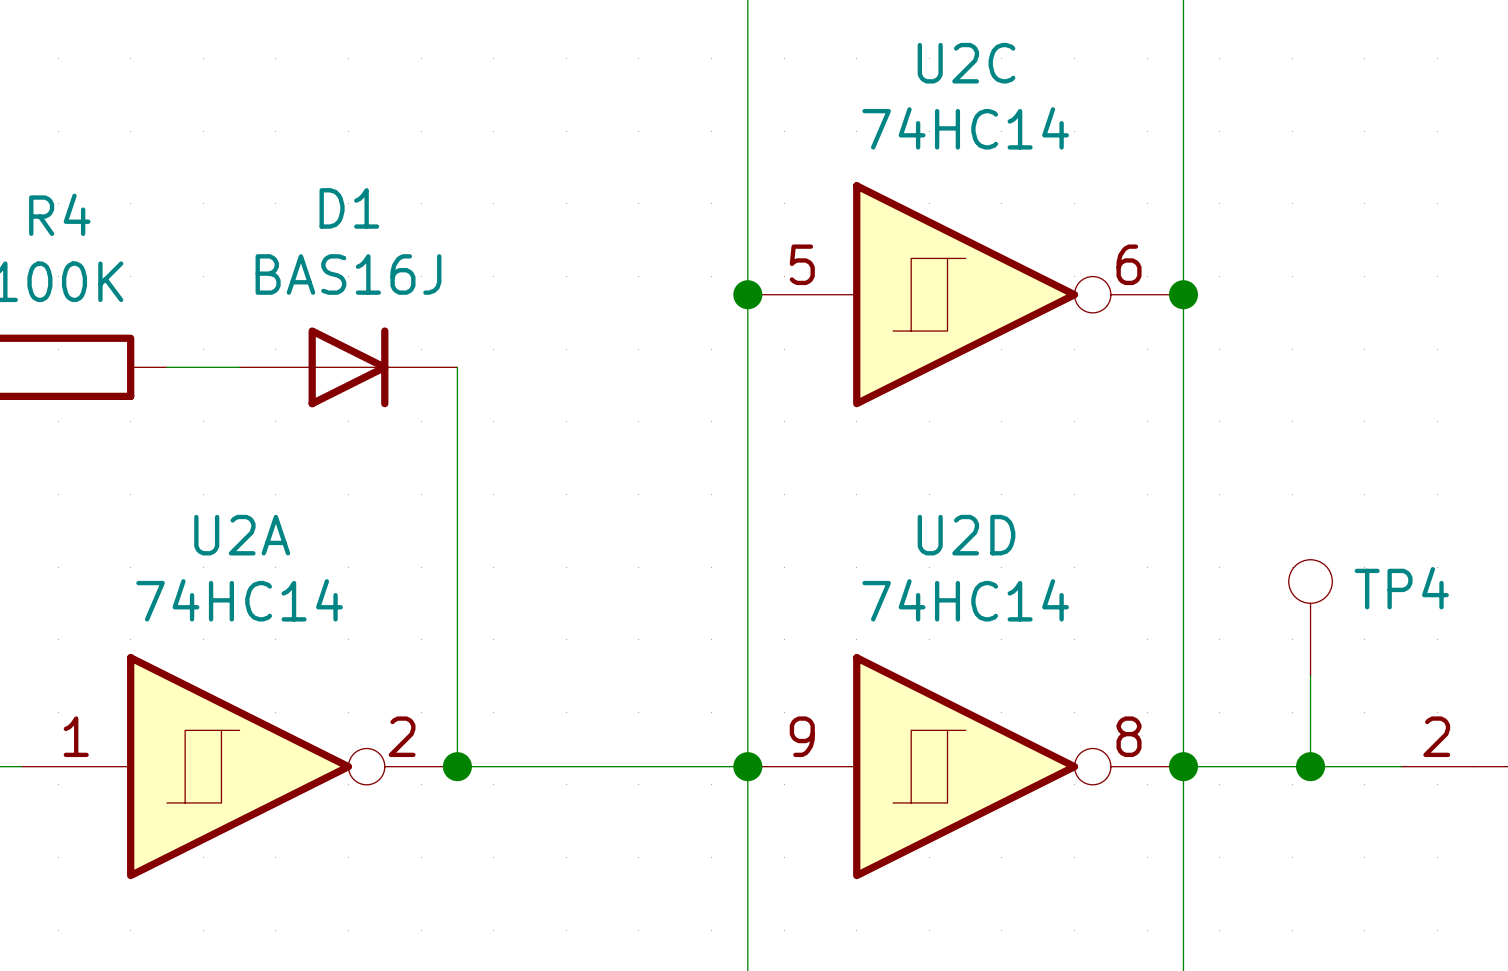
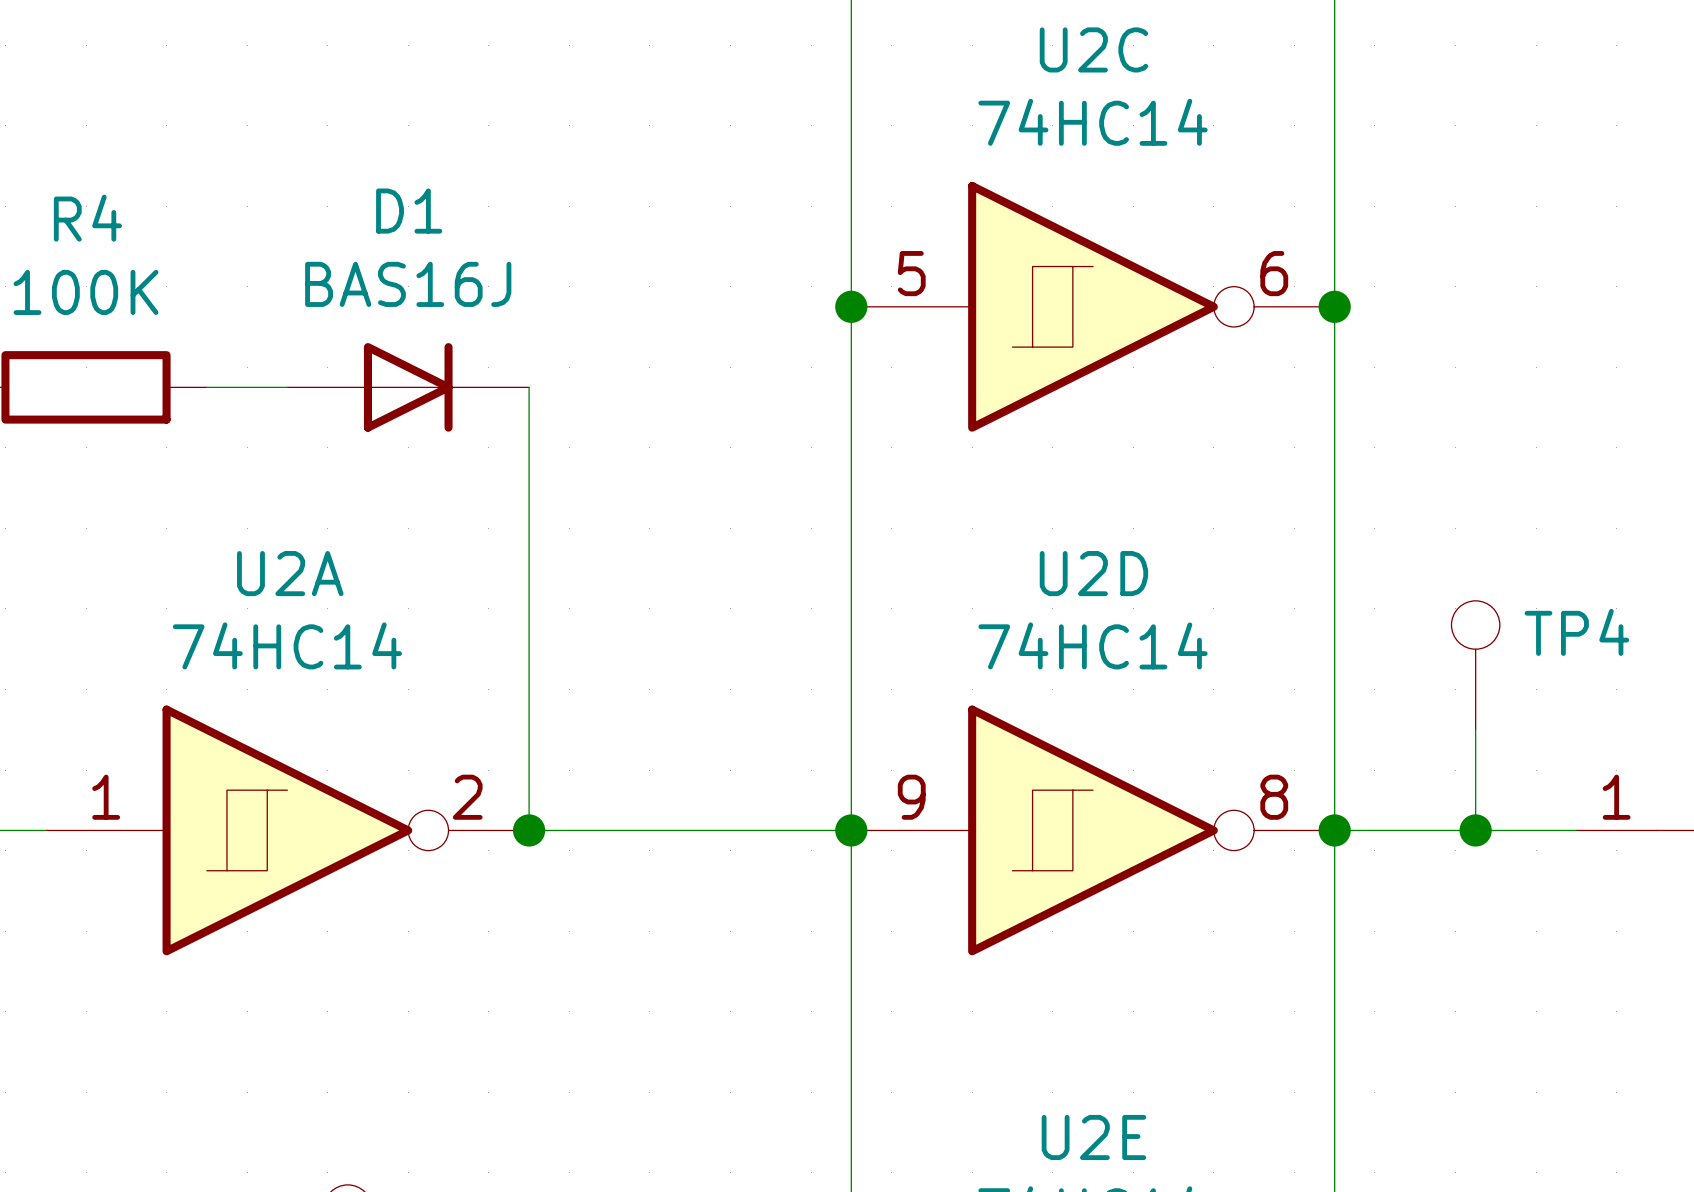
part pin number: 2 (1436, 736) -> 1 (1616, 797)

